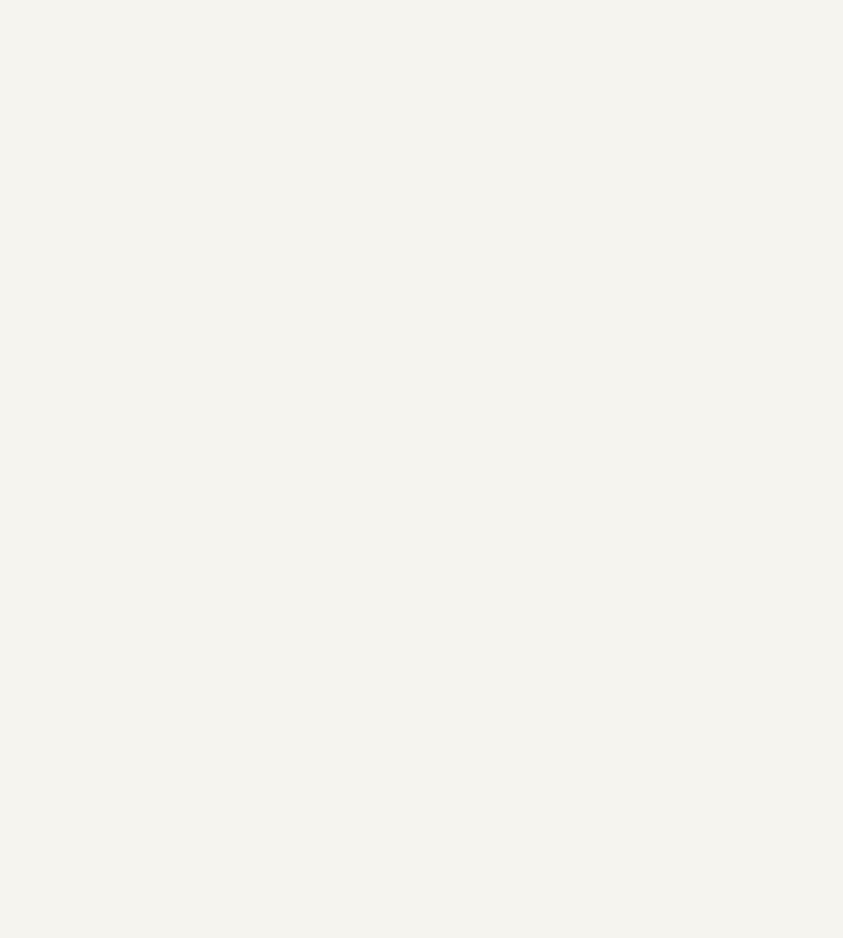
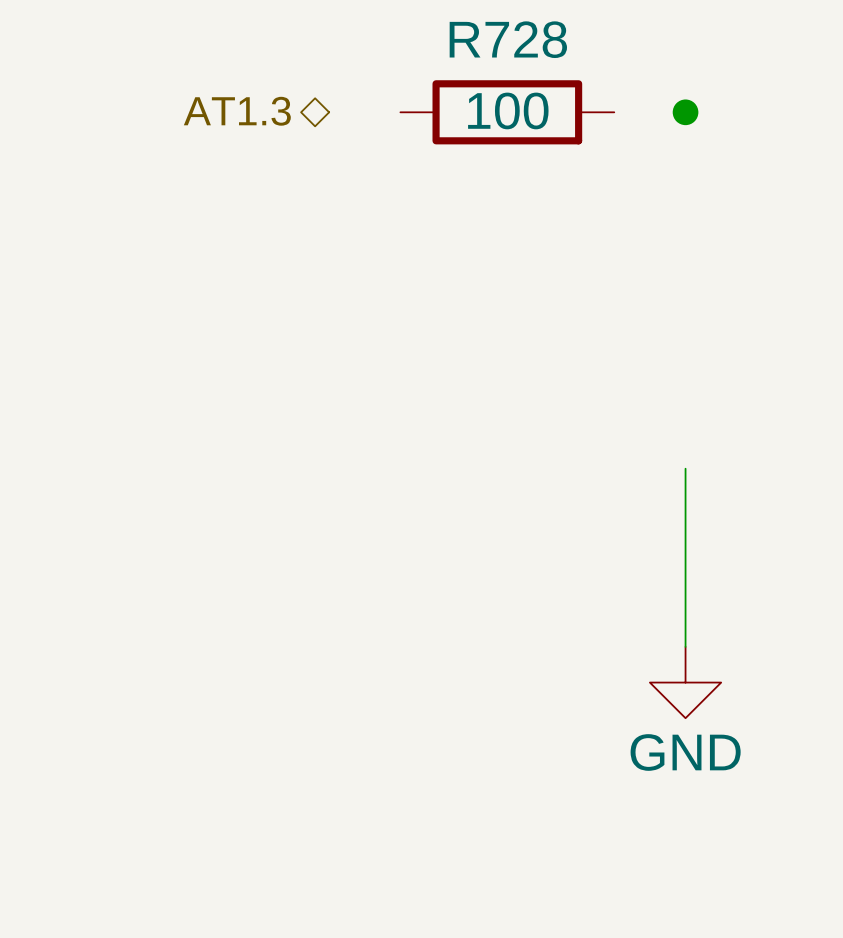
hierarchical label: none -> AT1.3 (237, 111)
R728: none -> 100 (507, 112)
junction: none -> (685, 112)
wire: none -> (685, 468) (685, 646)
power symbol: none -> GND (685, 682)

